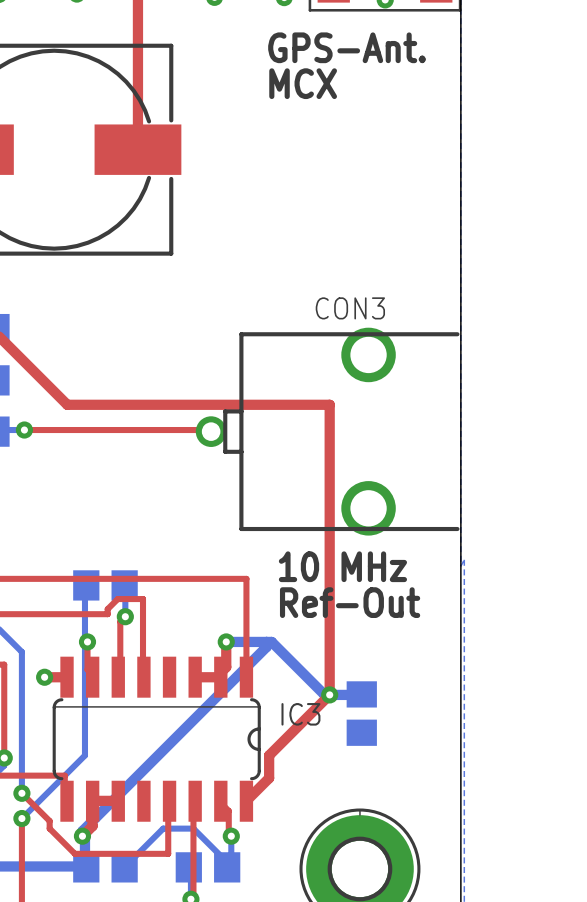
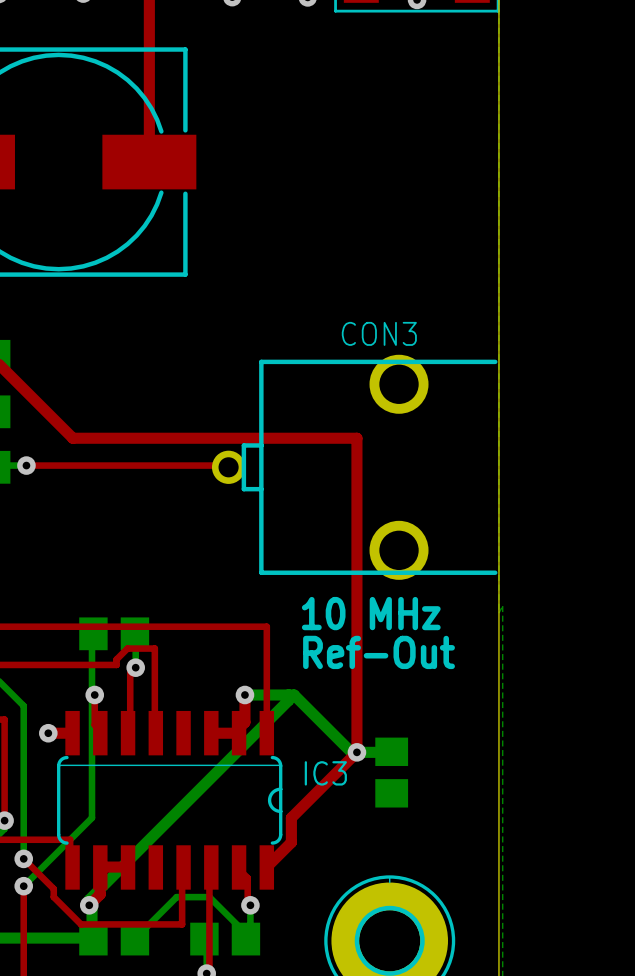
text: GPS-Ant. (347, 47) -> none
text: MCX (303, 83) -> none

